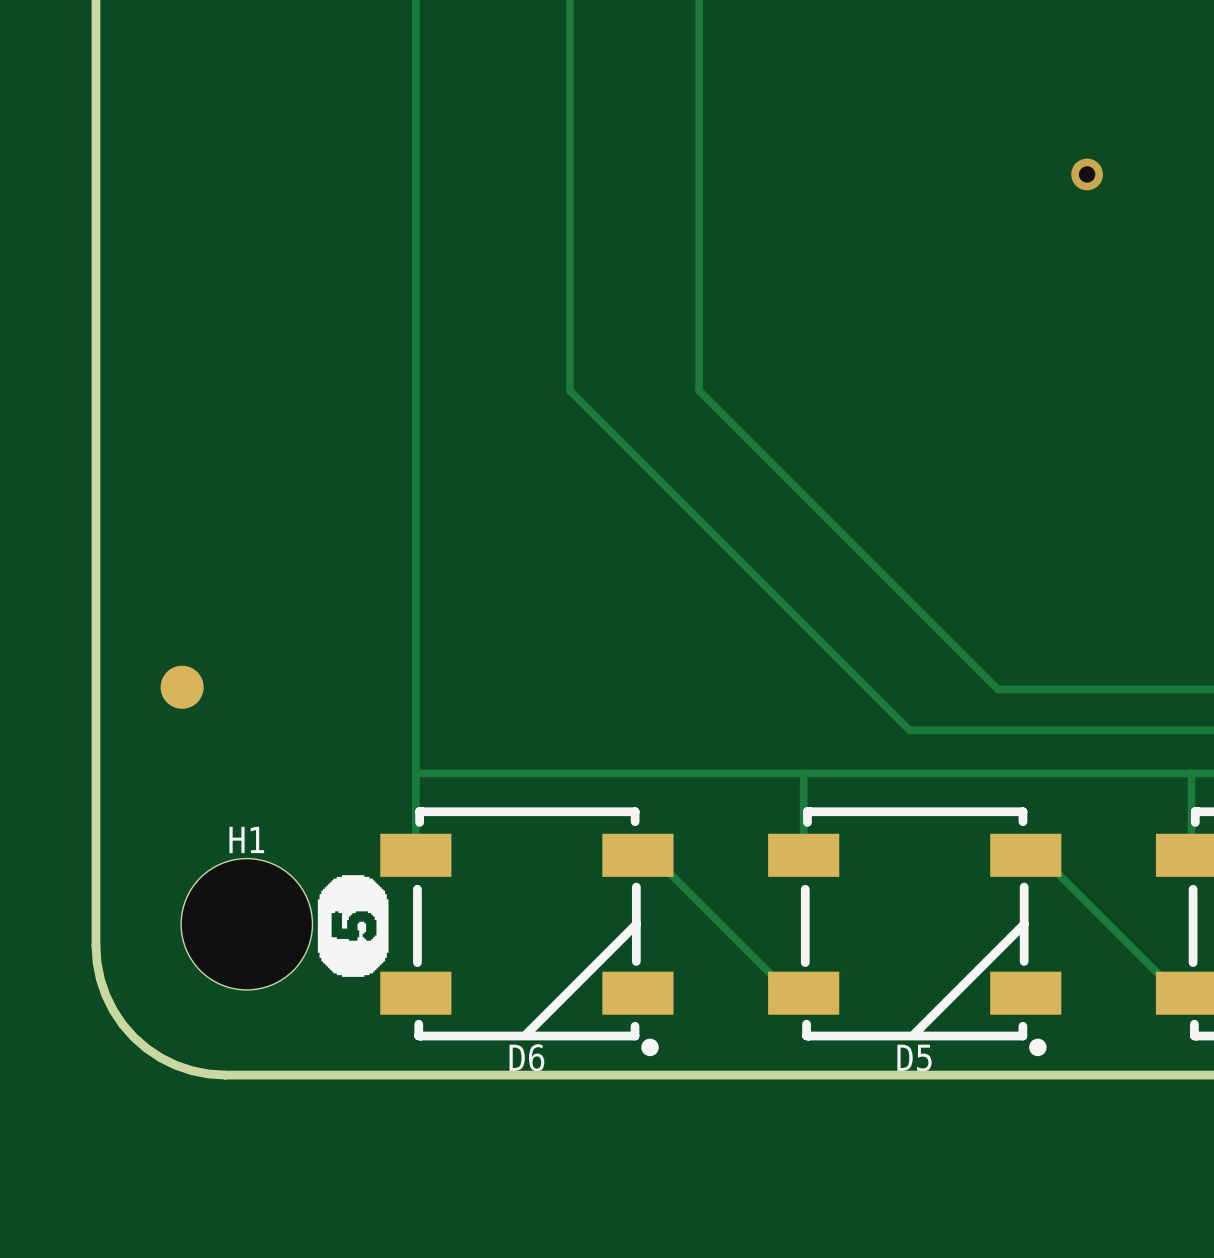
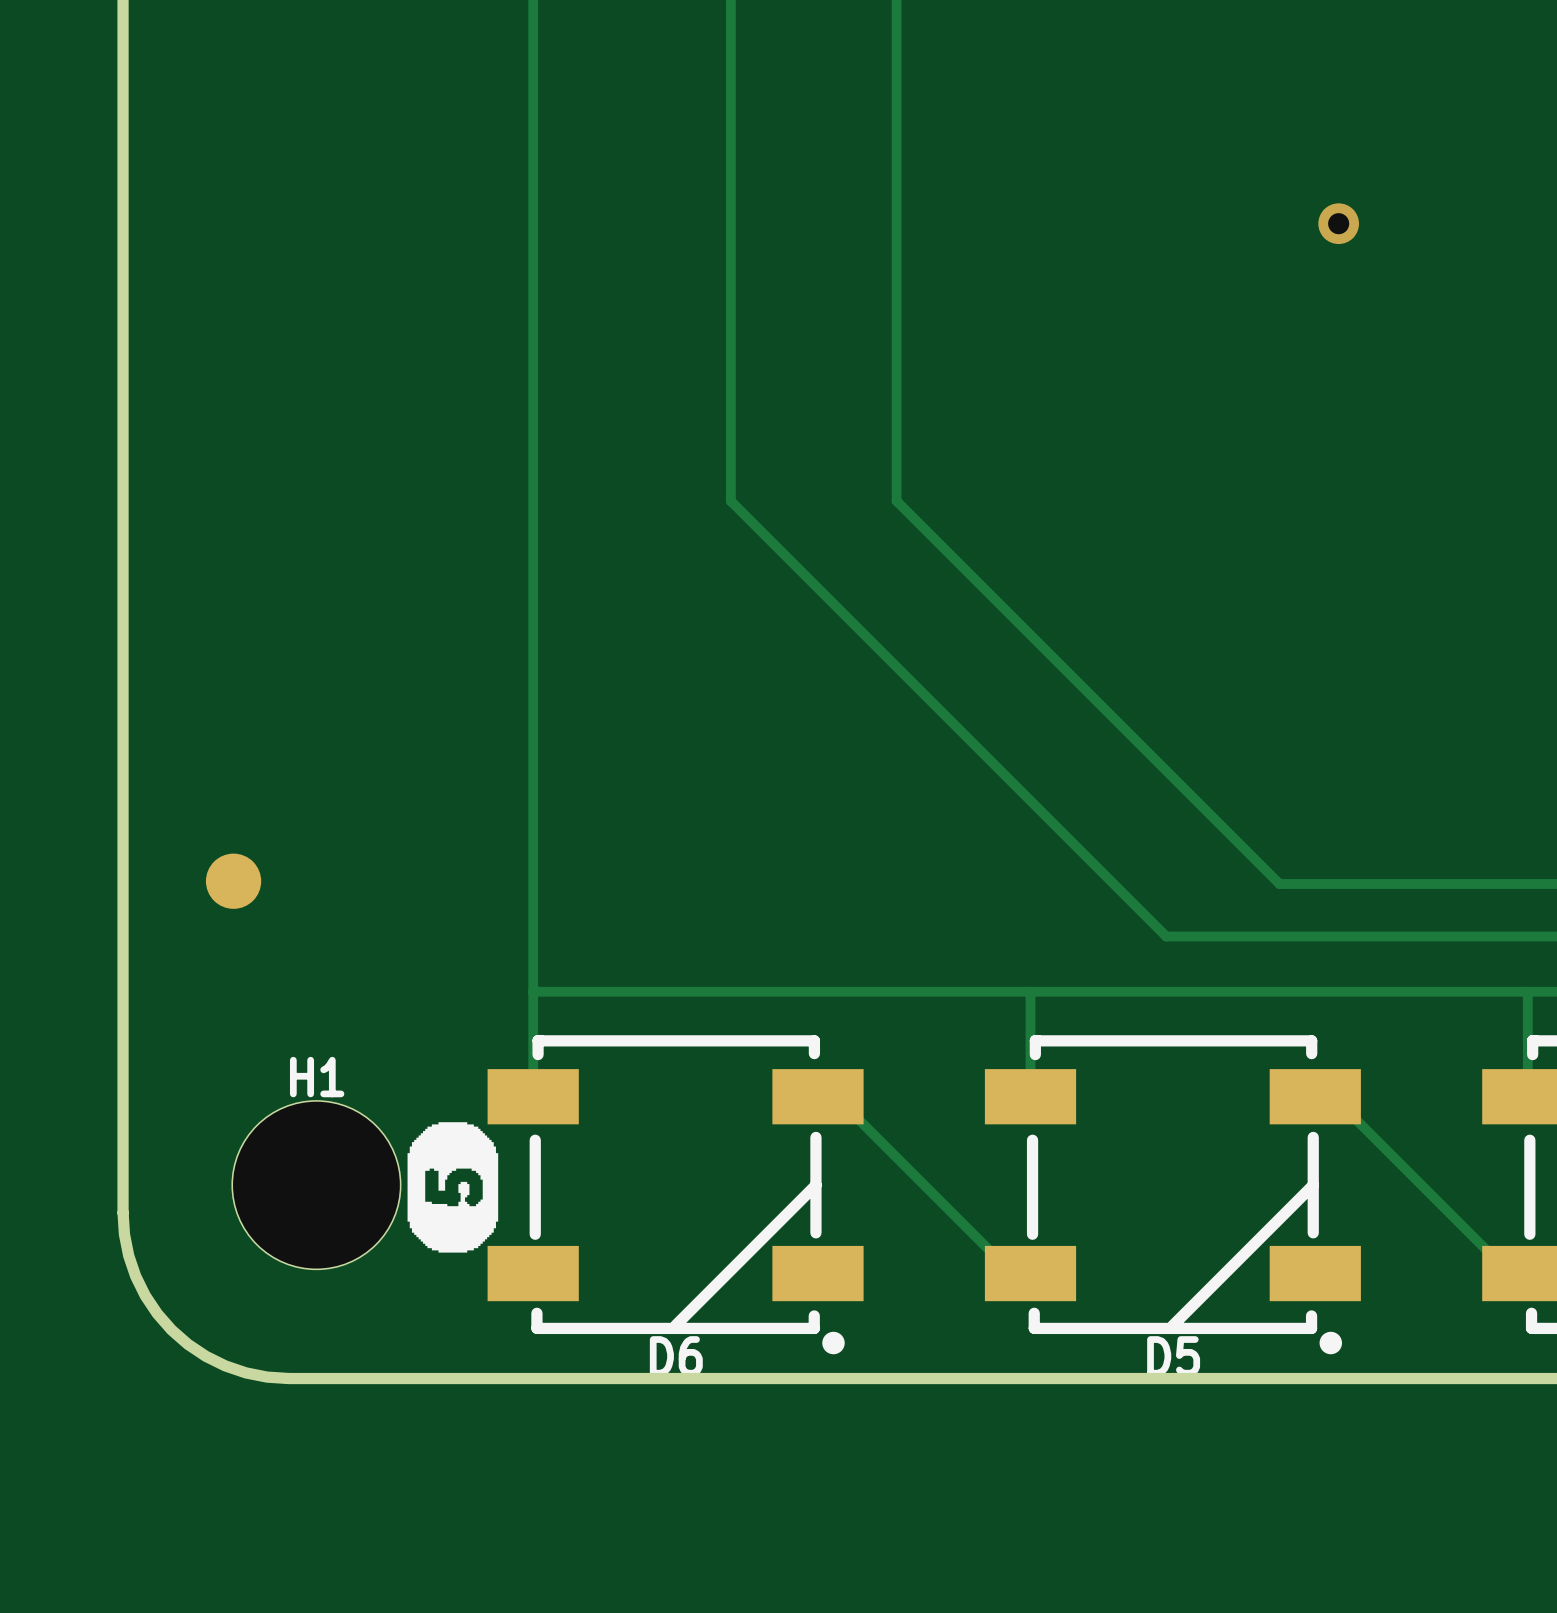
via position: (1087, 174) -> (1338, 223)

